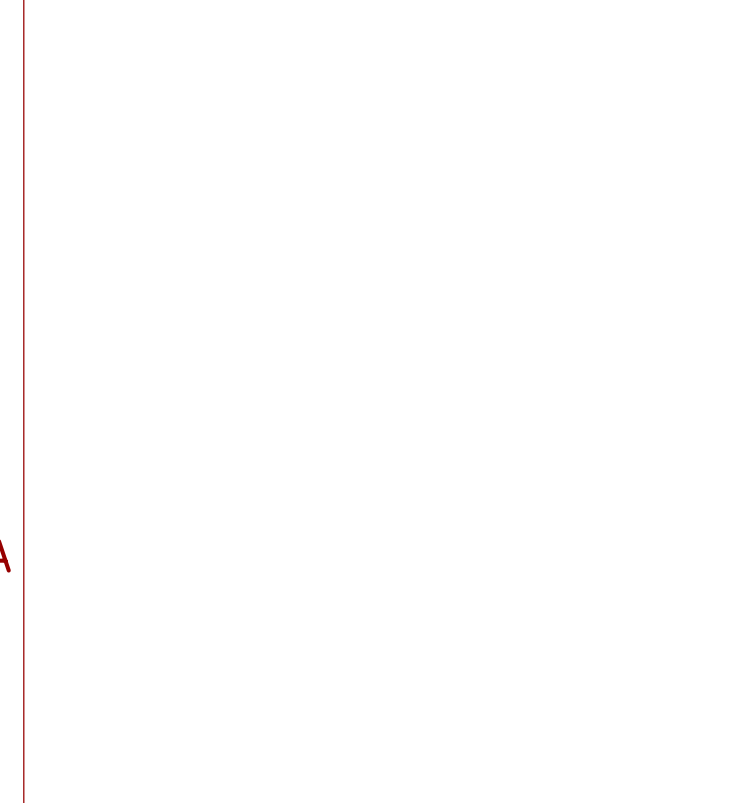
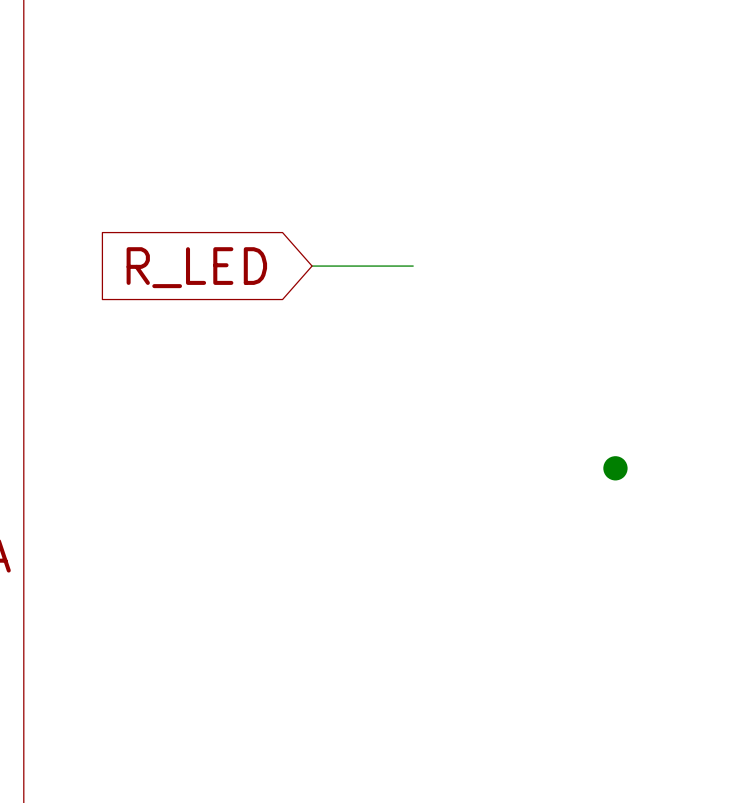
wire: none -> (312, 266) (413, 266)
global label: none -> R_LED (196, 267)
junction: none -> (615, 468)

